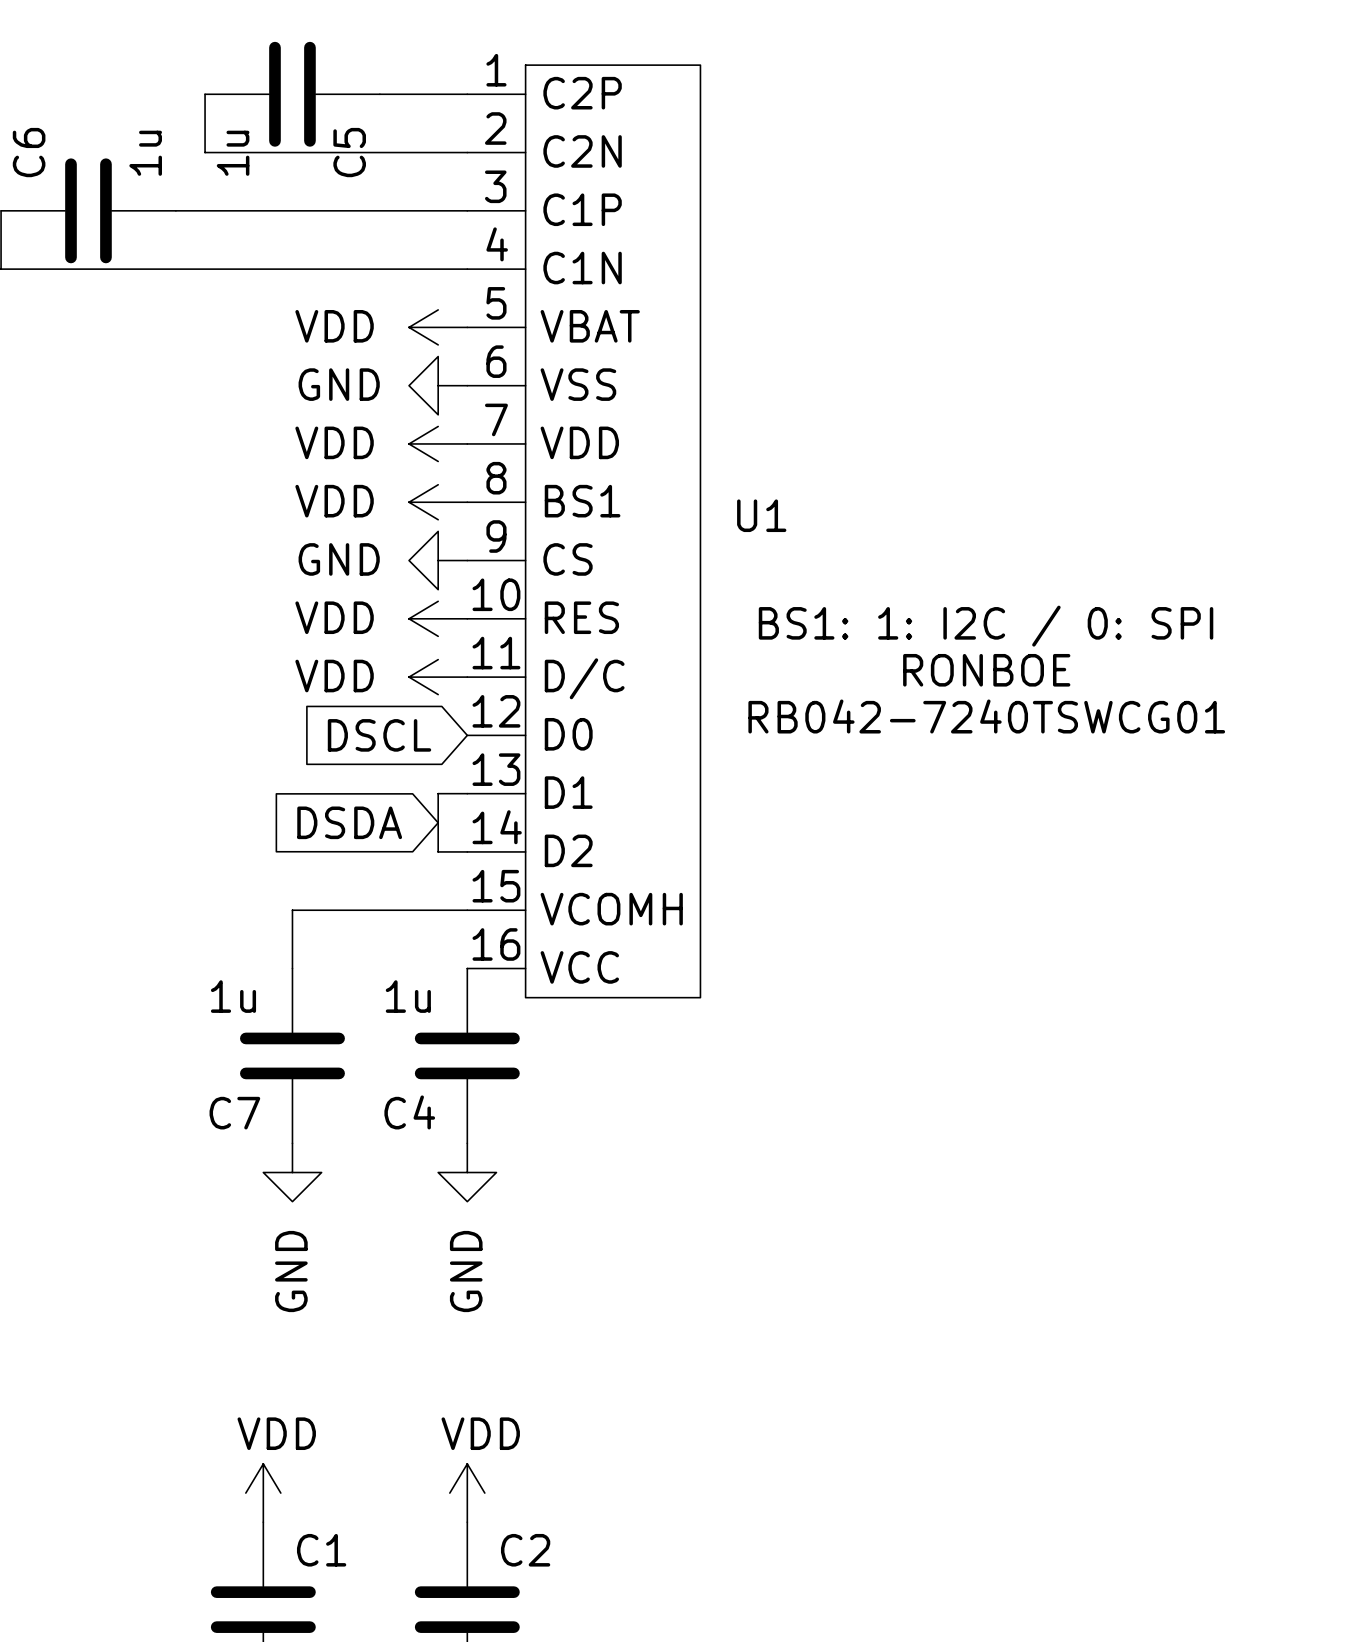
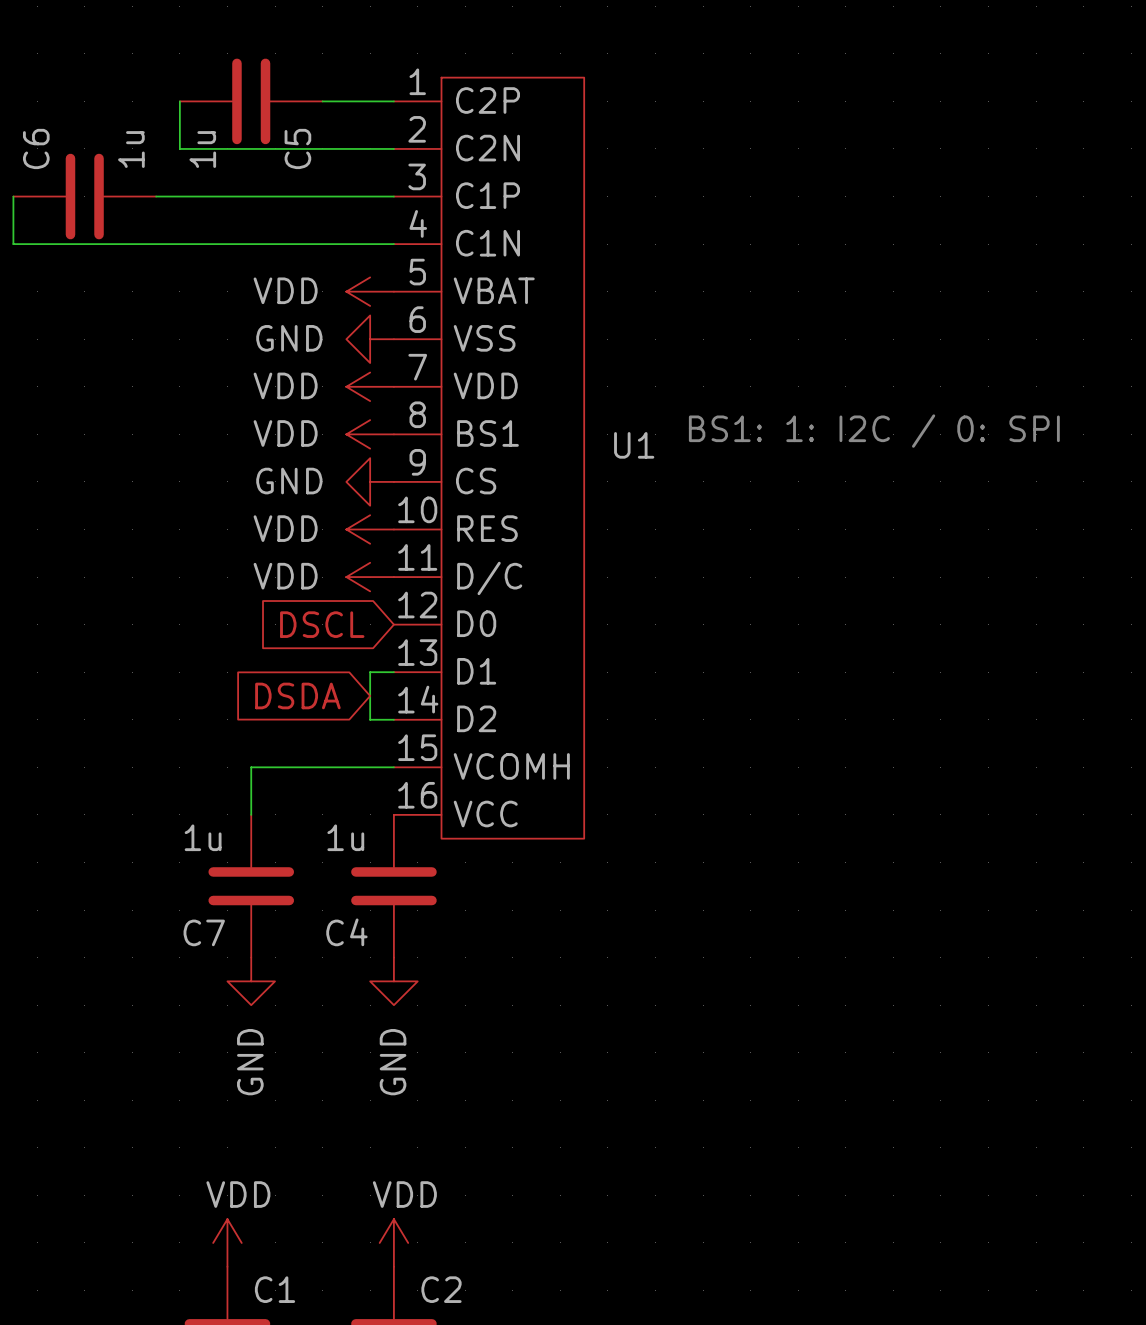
text position: BS1: 1: I2C / 0: SPI (986, 626) -> BS1: 1: I2C / 0: SPI (874, 431)
text: RONBOE (986, 670) -> none
text: RB042-7240TSWCG01 (986, 716) -> none

